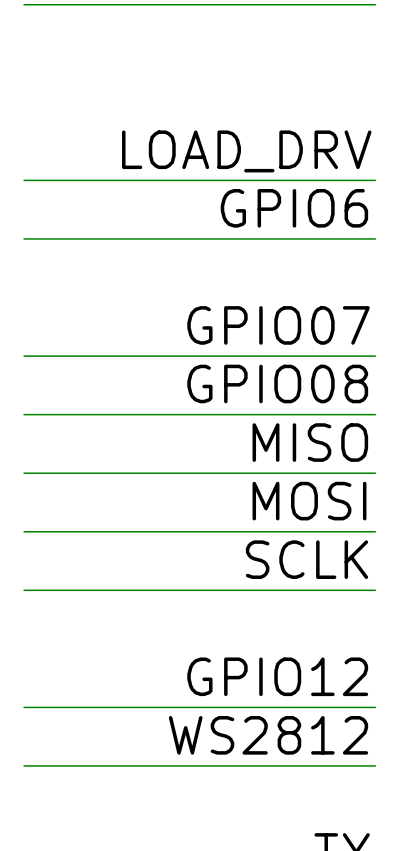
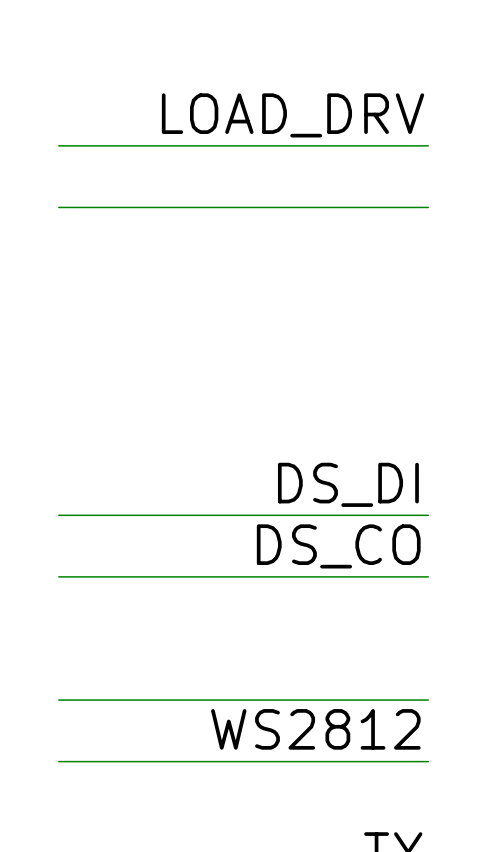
label: GPIO6 (294, 208) -> none
label: GPIO07 (278, 325) -> none
wire: (24, 356) (375, 356) -> none
label: GPIO08 (277, 383) -> none
wire: (24, 414) (375, 414) -> none
label: MISO (310, 442) -> none
wire: (24, 473) (375, 473) -> none
label: MOSI (309, 501) -> DS_DI (348, 484)
label: SCLK (306, 559) -> DS_CO (338, 546)
label: GPIO12 (277, 676) -> none

